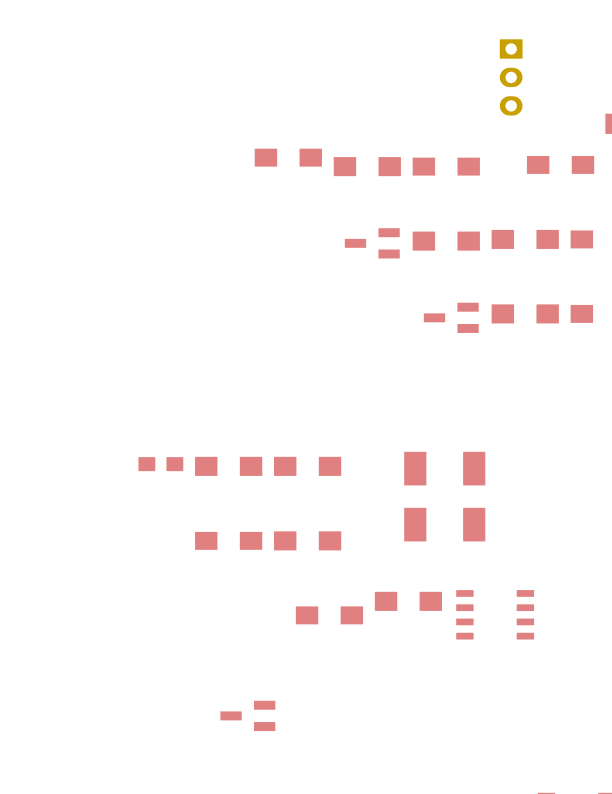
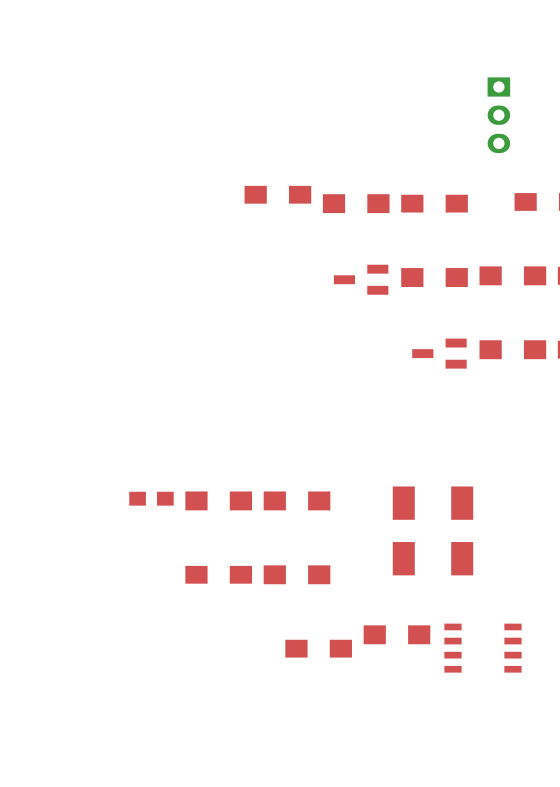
part: (247, 715) -> none

